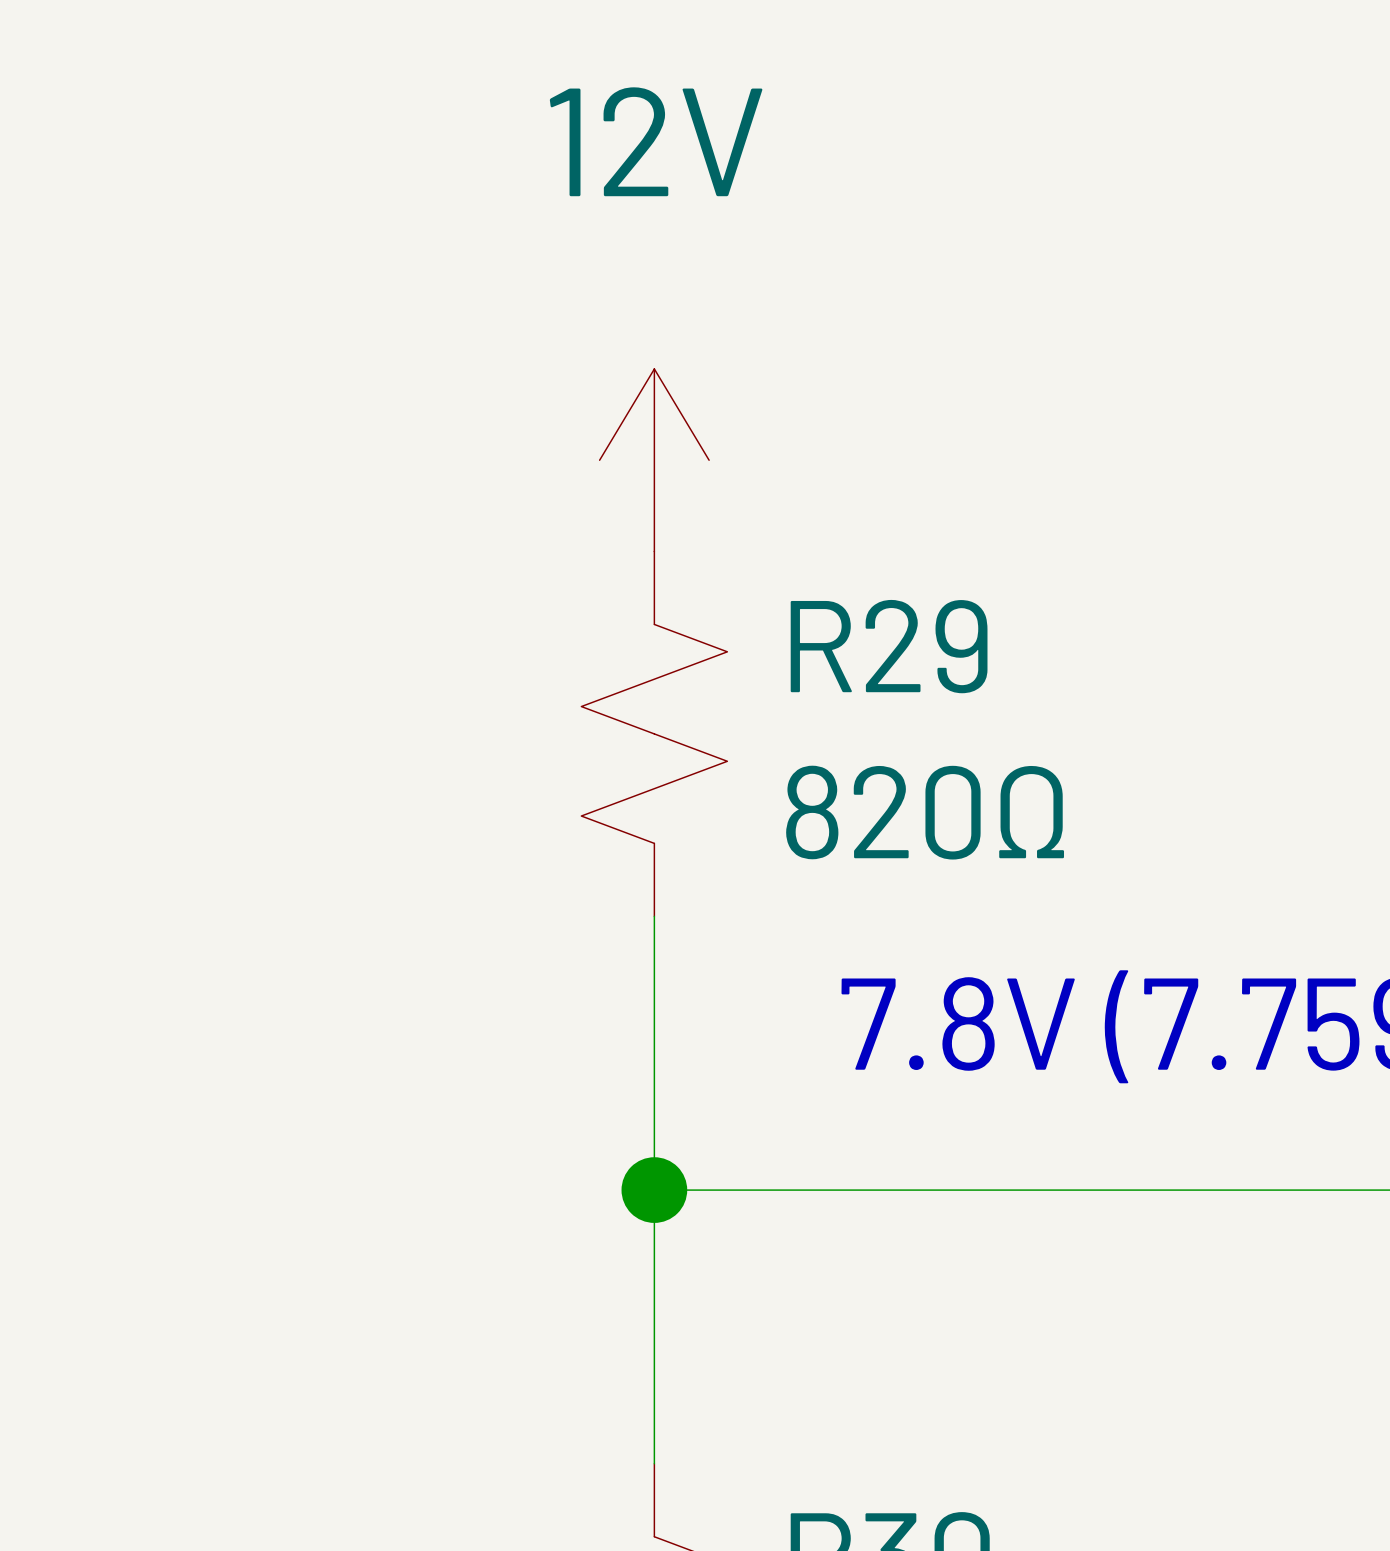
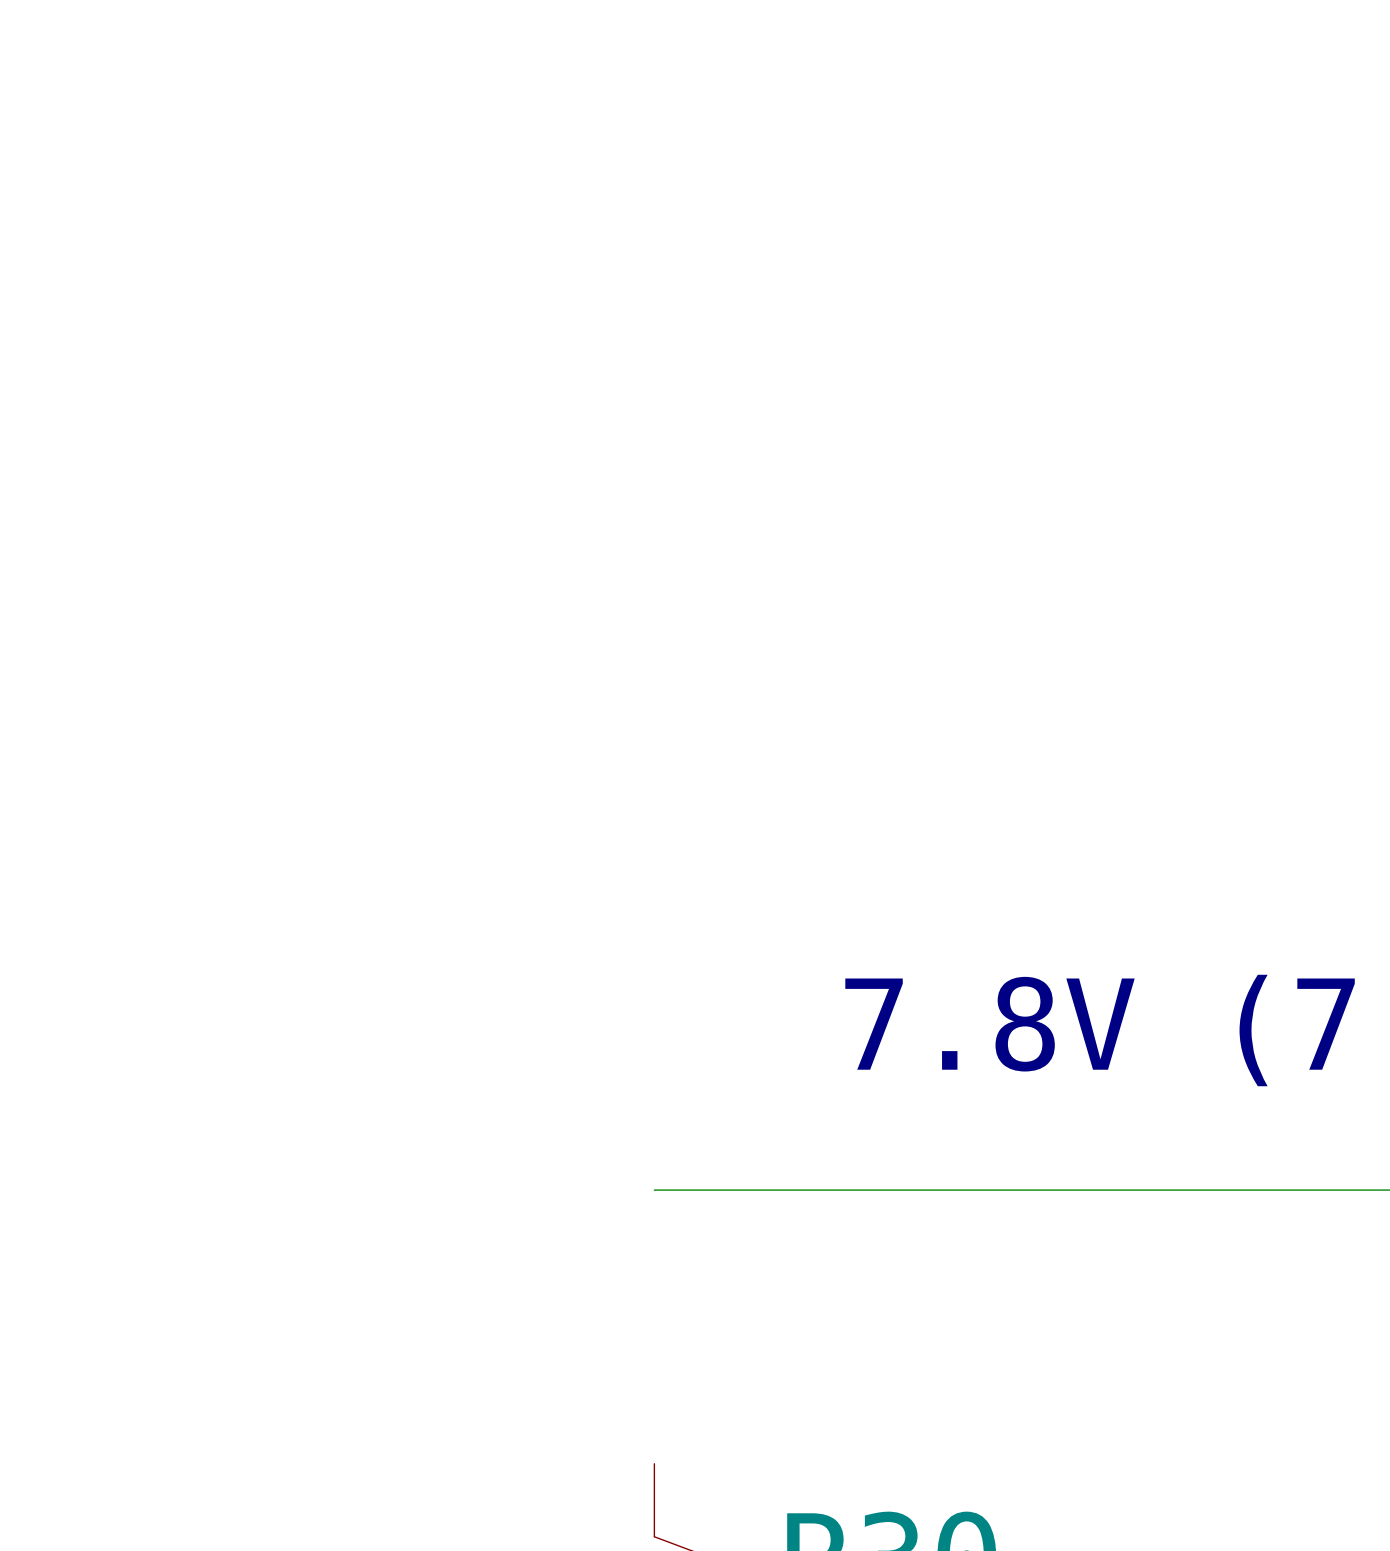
power symbol: 12V (654, 460) -> none
R29: (654, 733) -> none
wire: (654, 916) (654, 1463) -> none
junction: (654, 1190) -> none

